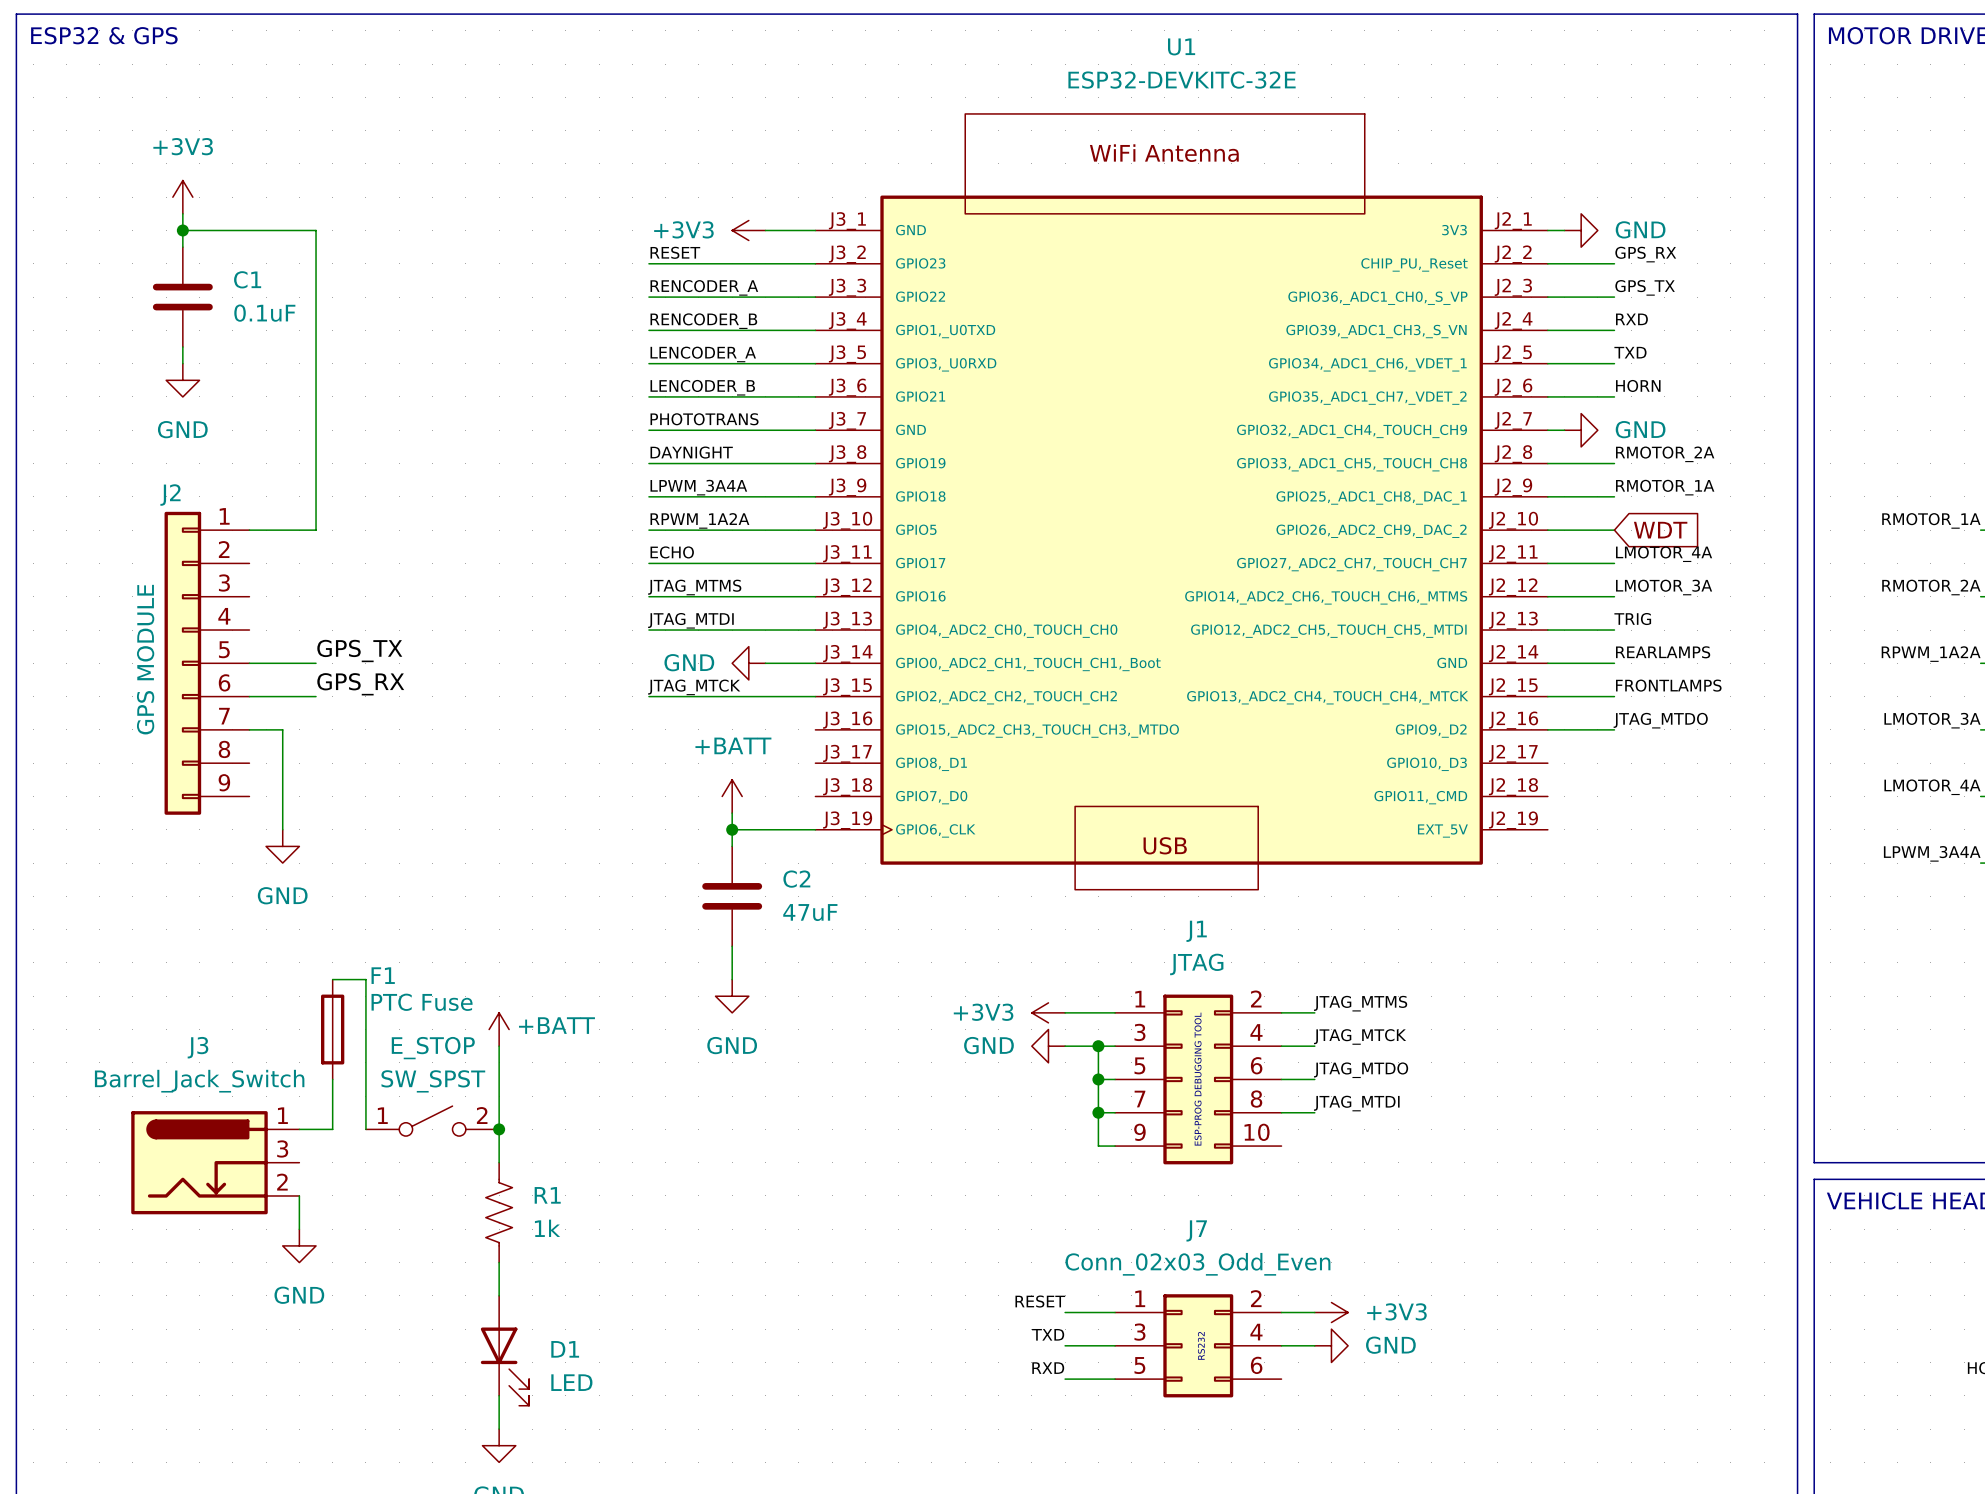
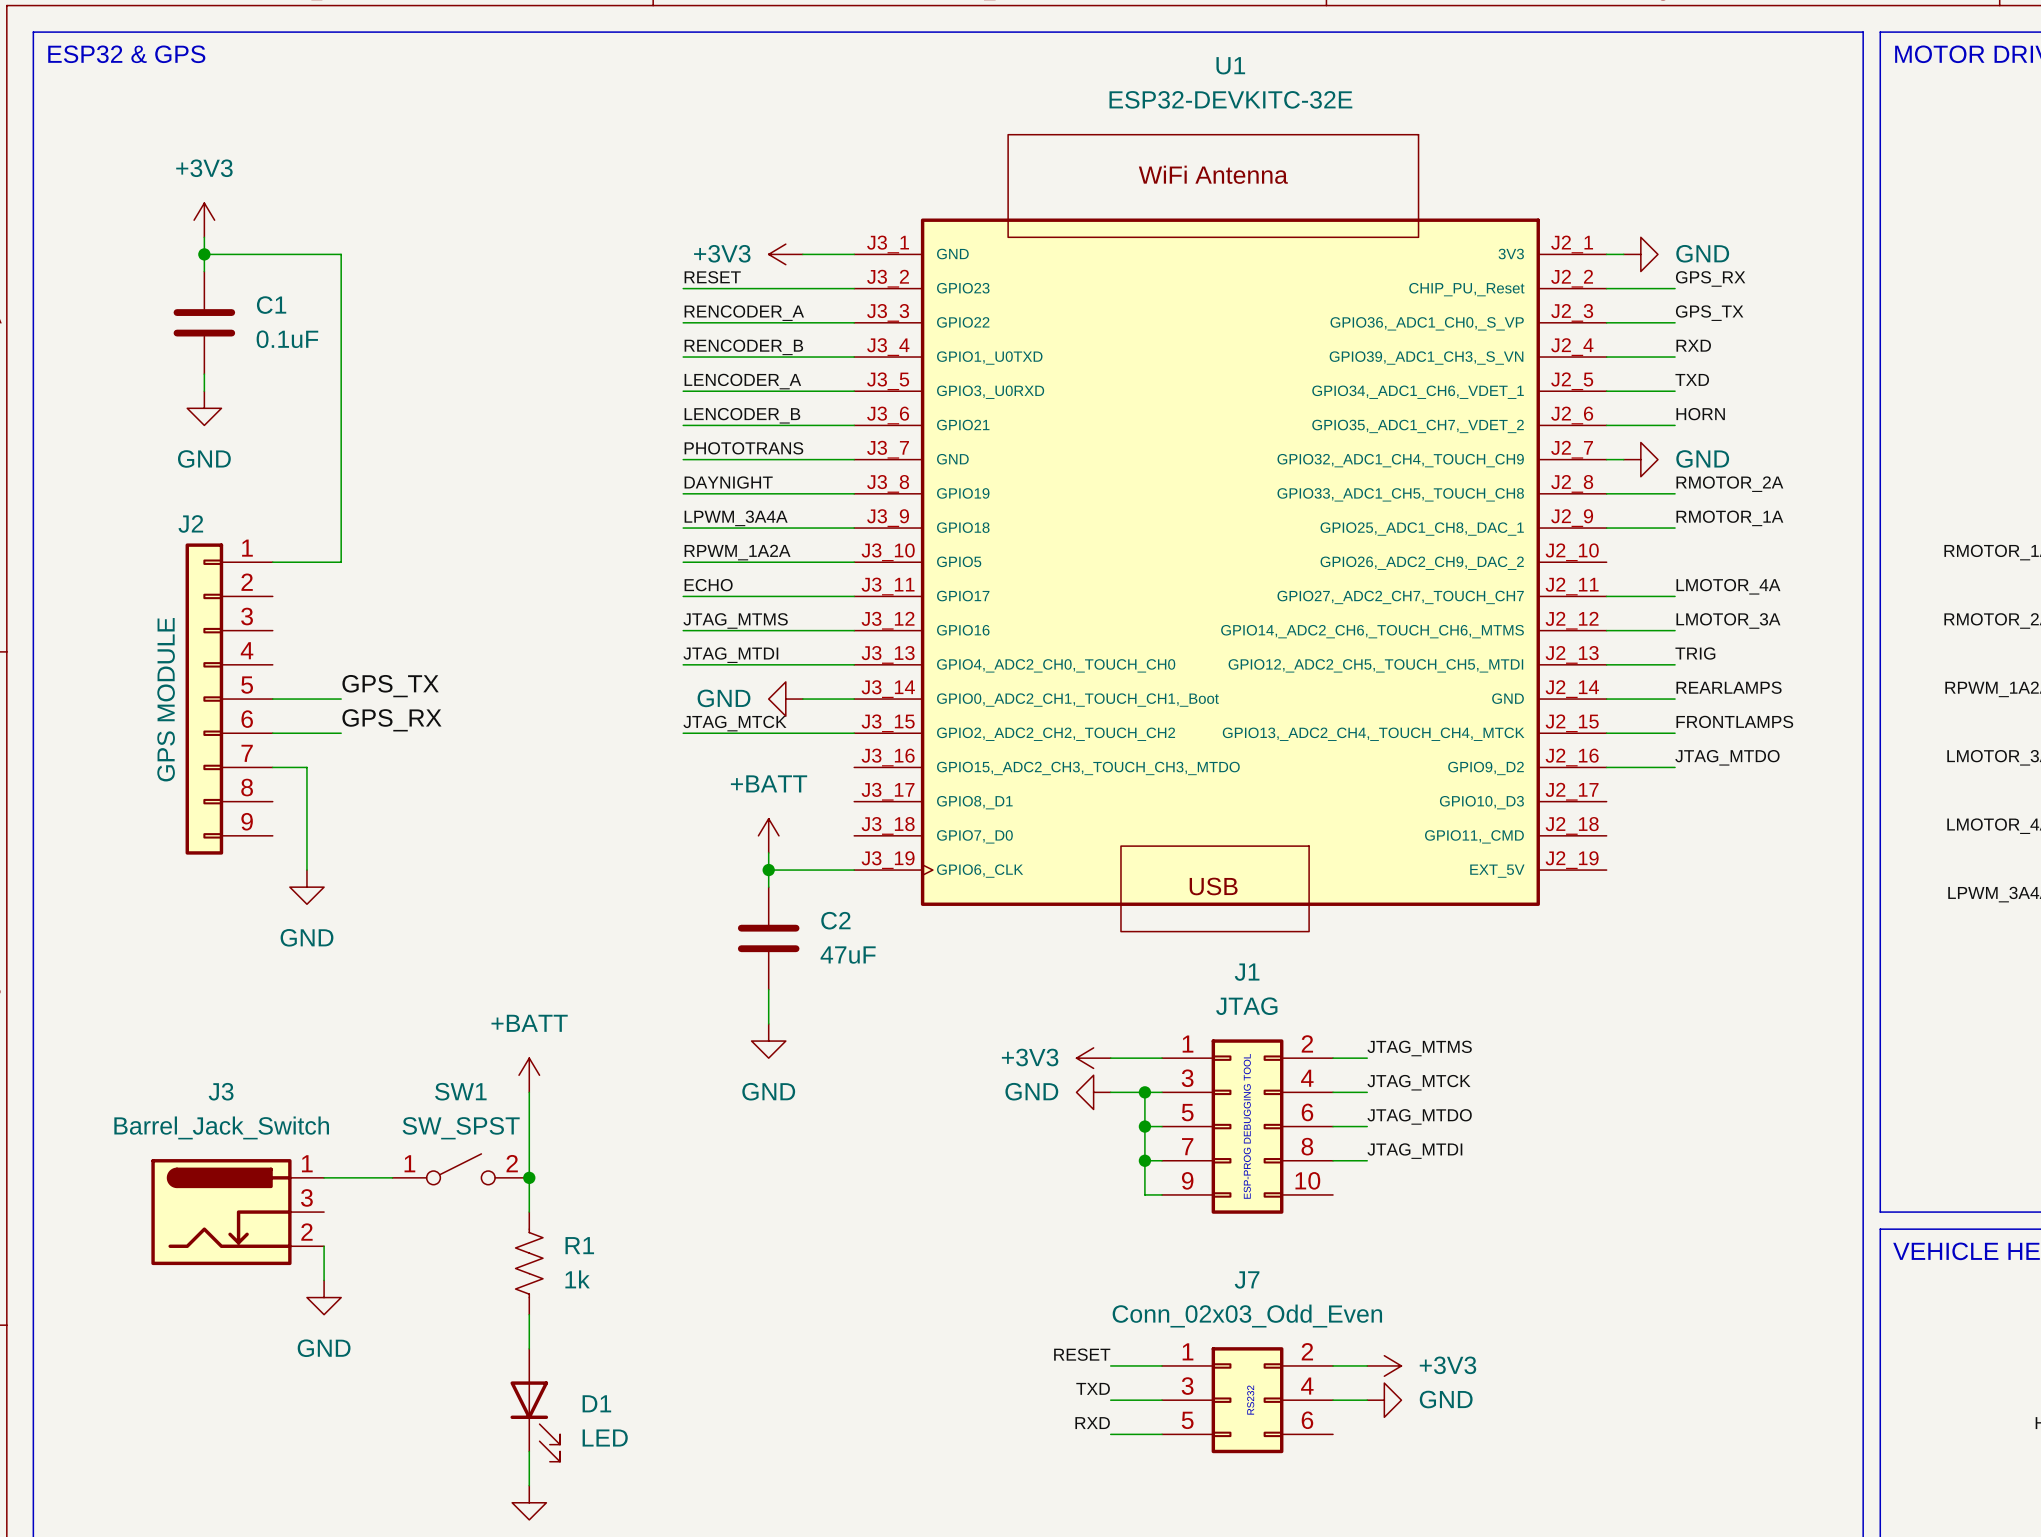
wire: (1547, 530) (1614, 530) -> none
global label: WDT (1660, 530) -> none
wire: (332, 979) (365, 979) (365, 1129) -> none
power symbol text position: +BATT (556, 1025) -> +BATT (529, 1023)
F1: PTC Fuse (332, 1029) -> none
E_STOP name: E_STOP (433, 1048) -> SW1 (460, 1091)
wire: (332, 1079) (332, 1129) -> (392, 1177) (358, 1177)

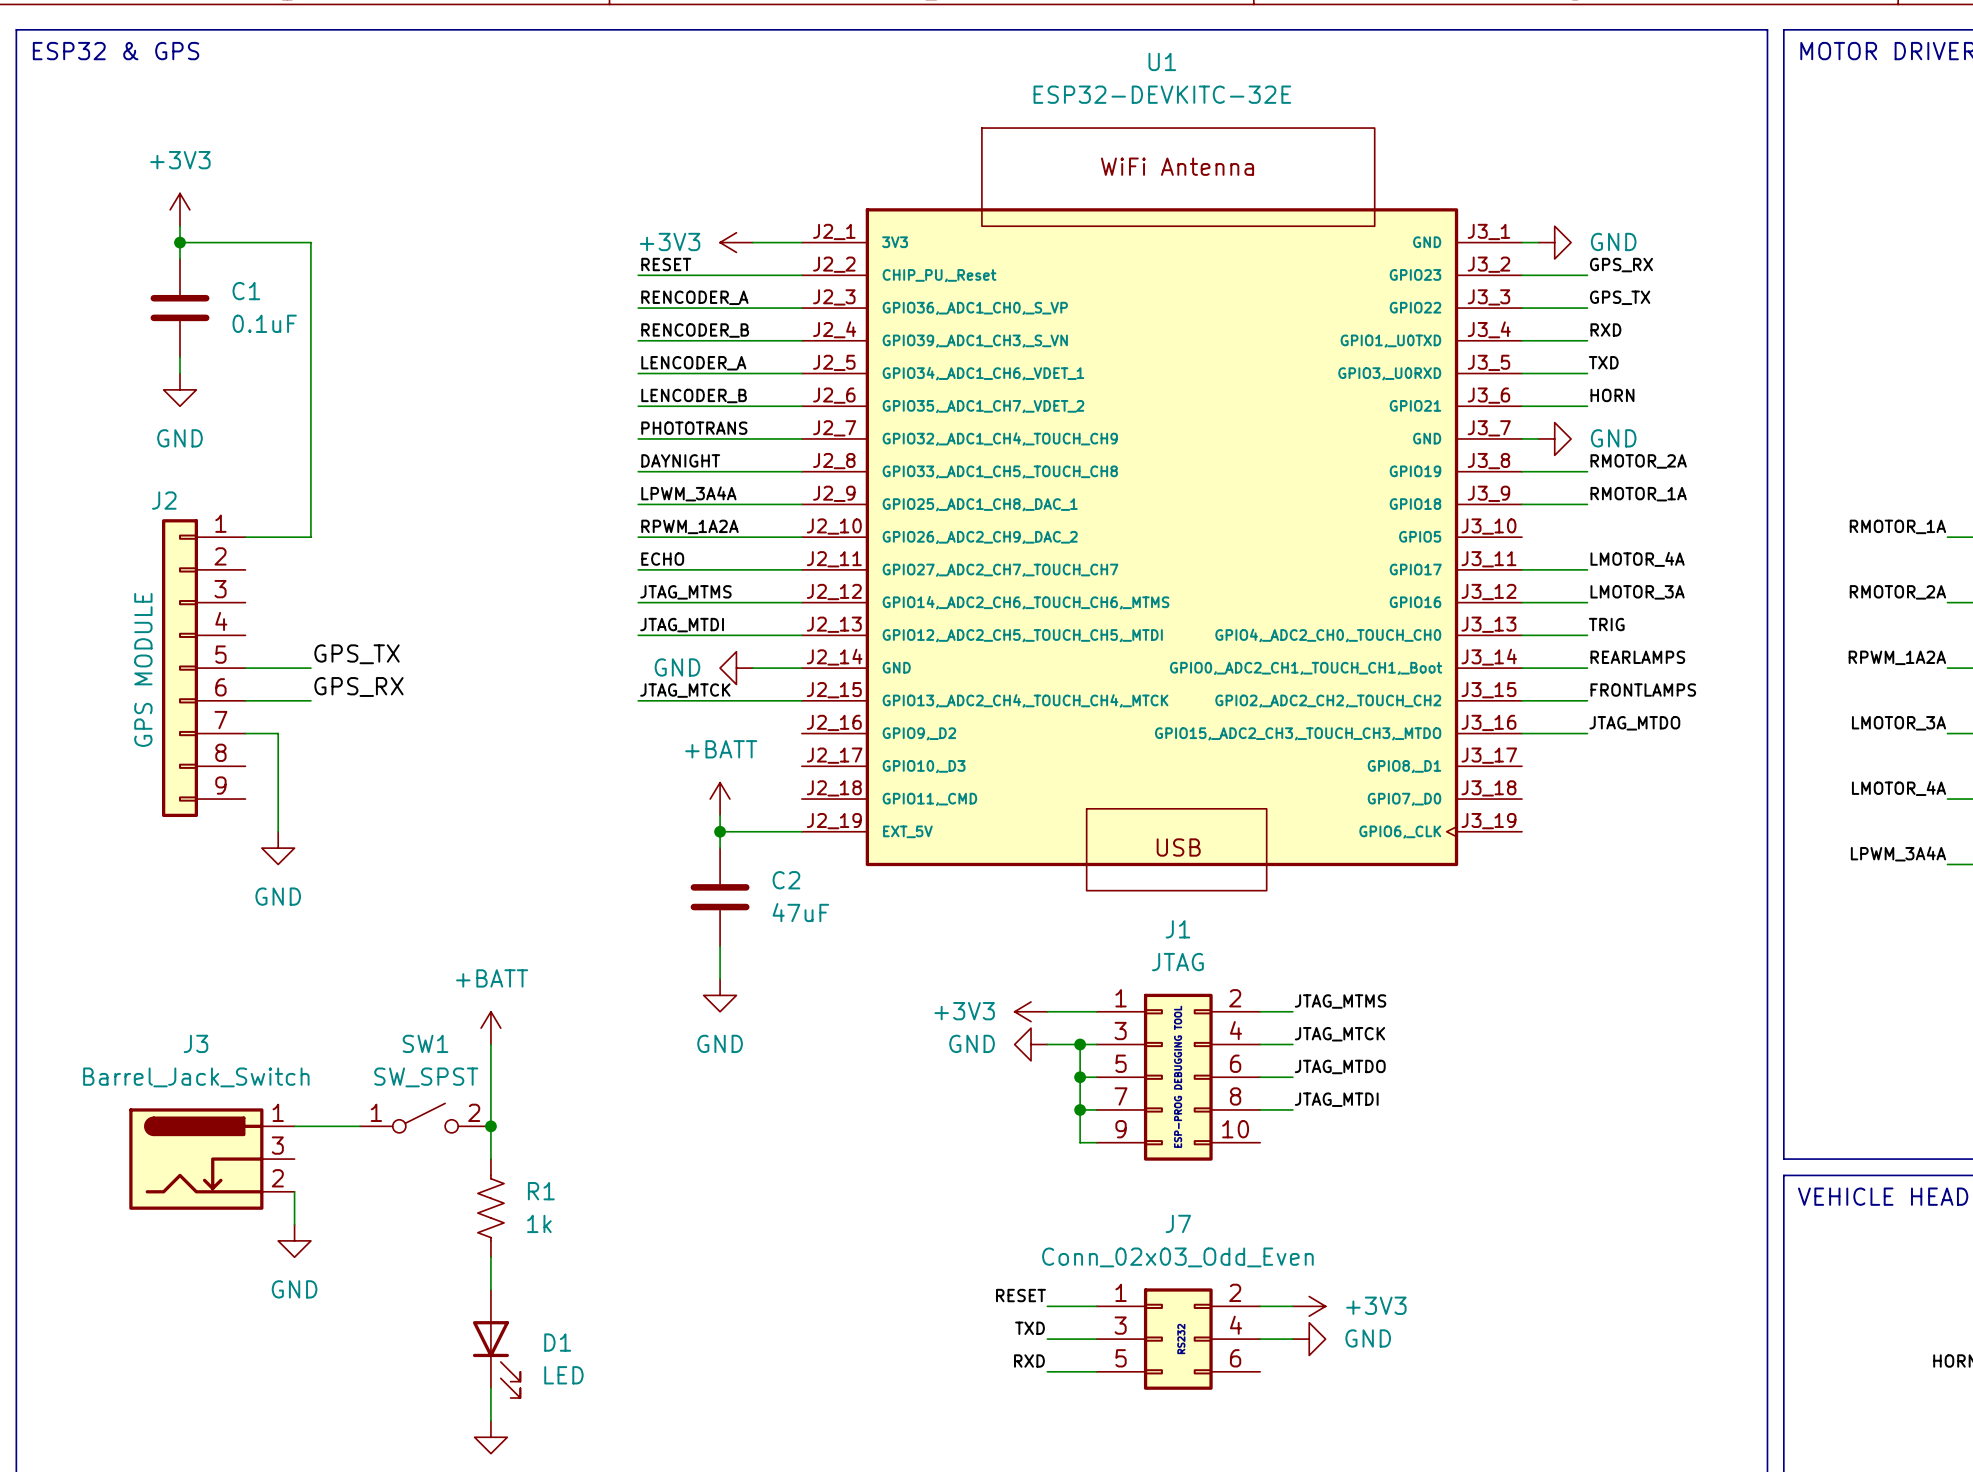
U1 flip: as is (1230, 533) -> left-right (1161, 509)

